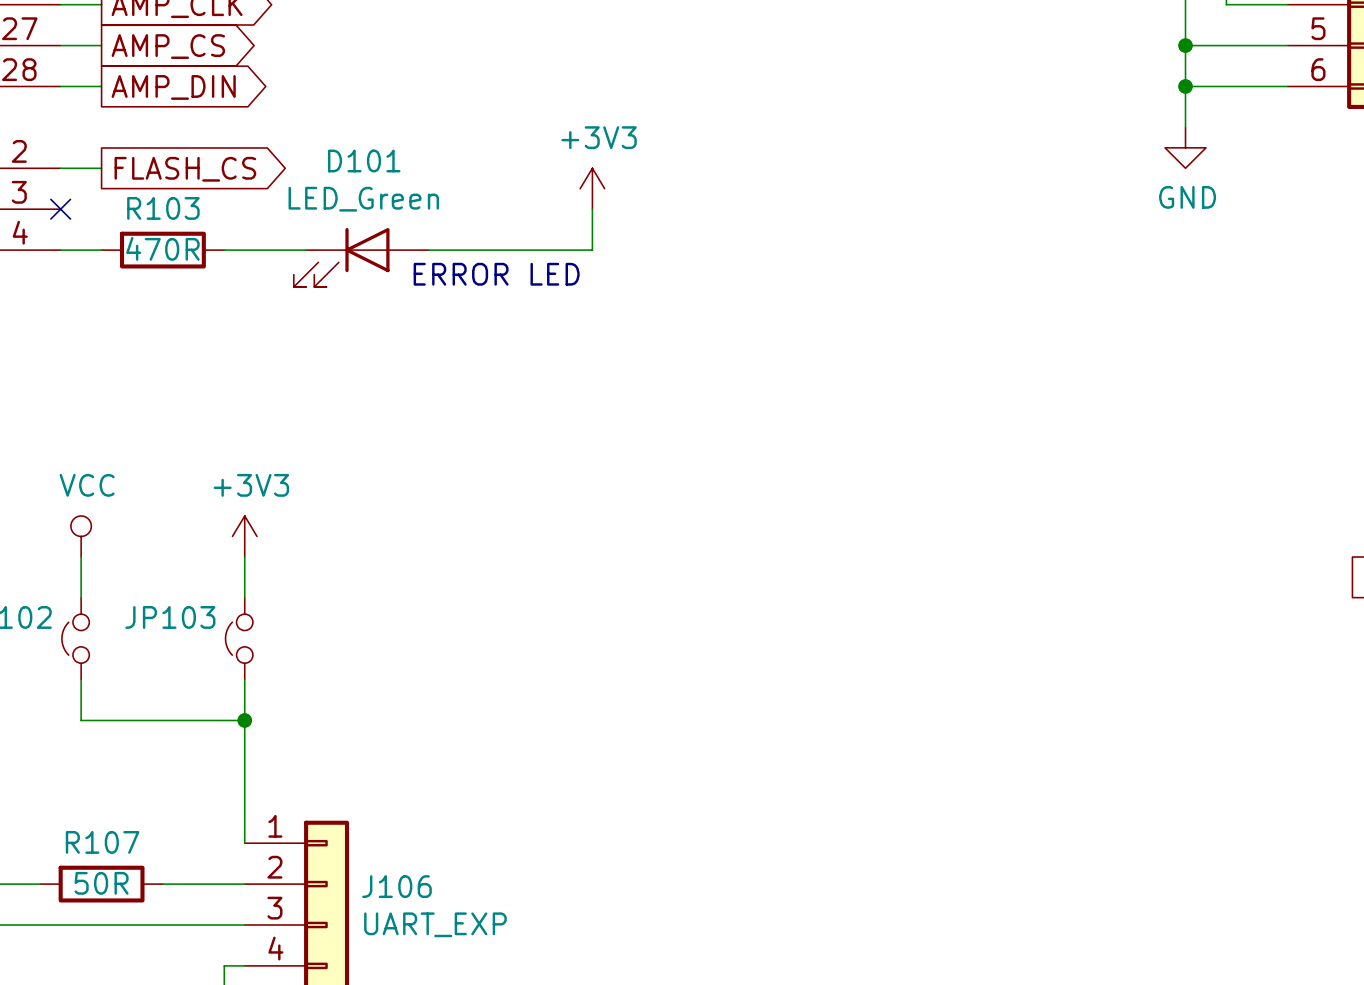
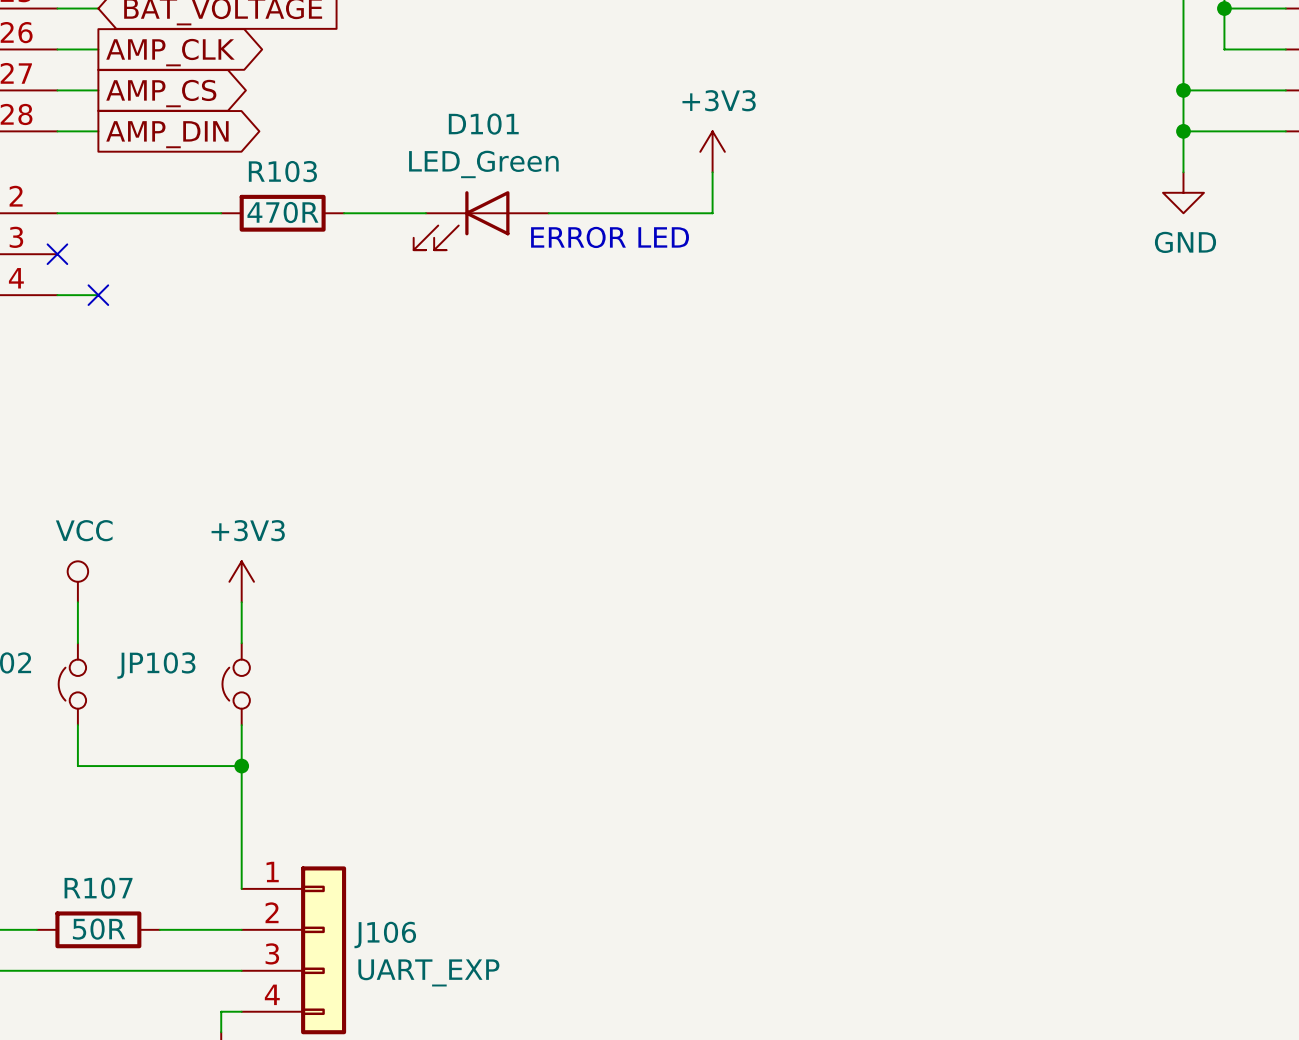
wire: none -> (98, 213) (221, 213)
global label: FLASH_CS (185, 169) -> none
power symbol position: +3V3 (592, 188) -> +3V3 (712, 151)
wire: (592, 209) (592, 250) (428, 250) -> (712, 172) (712, 213) (548, 213)
no-connect mark: none -> (98, 295)
R103 position: (162, 250) -> (282, 213)
wire: (224, 250) (306, 250) -> (344, 213) (425, 213)
D101 position: (361, 257) -> (481, 220)
text position: ERROR LED (496, 274) -> ERROR LED (610, 237)

